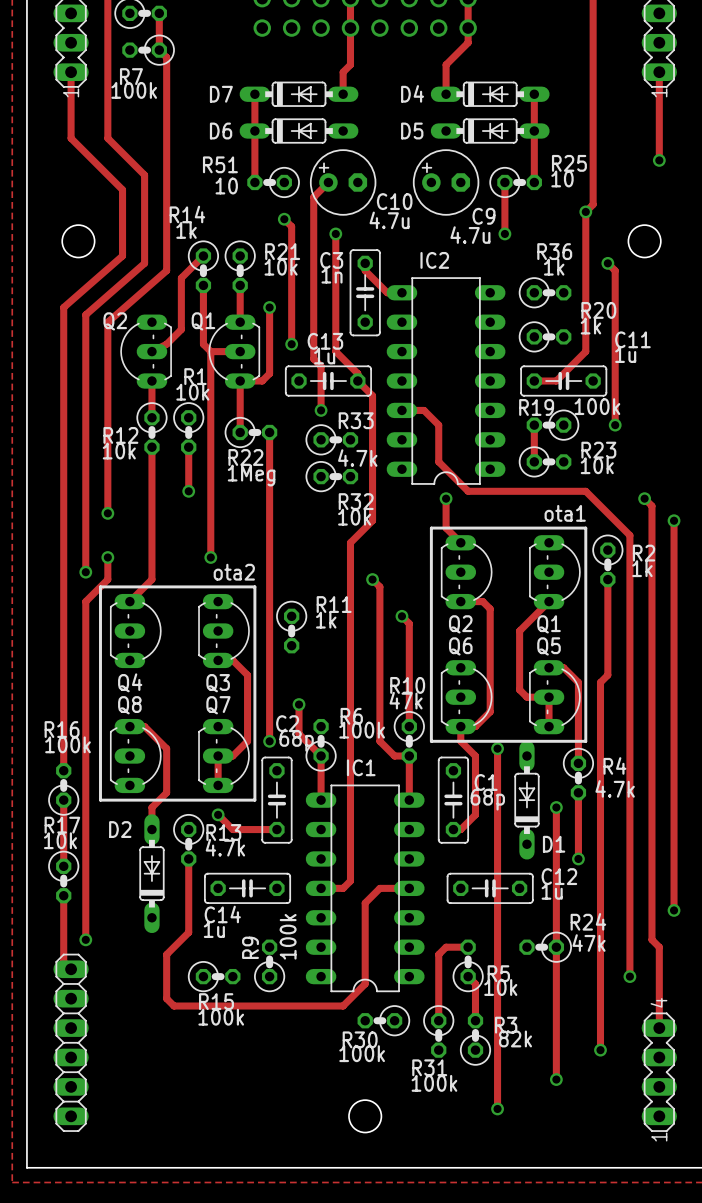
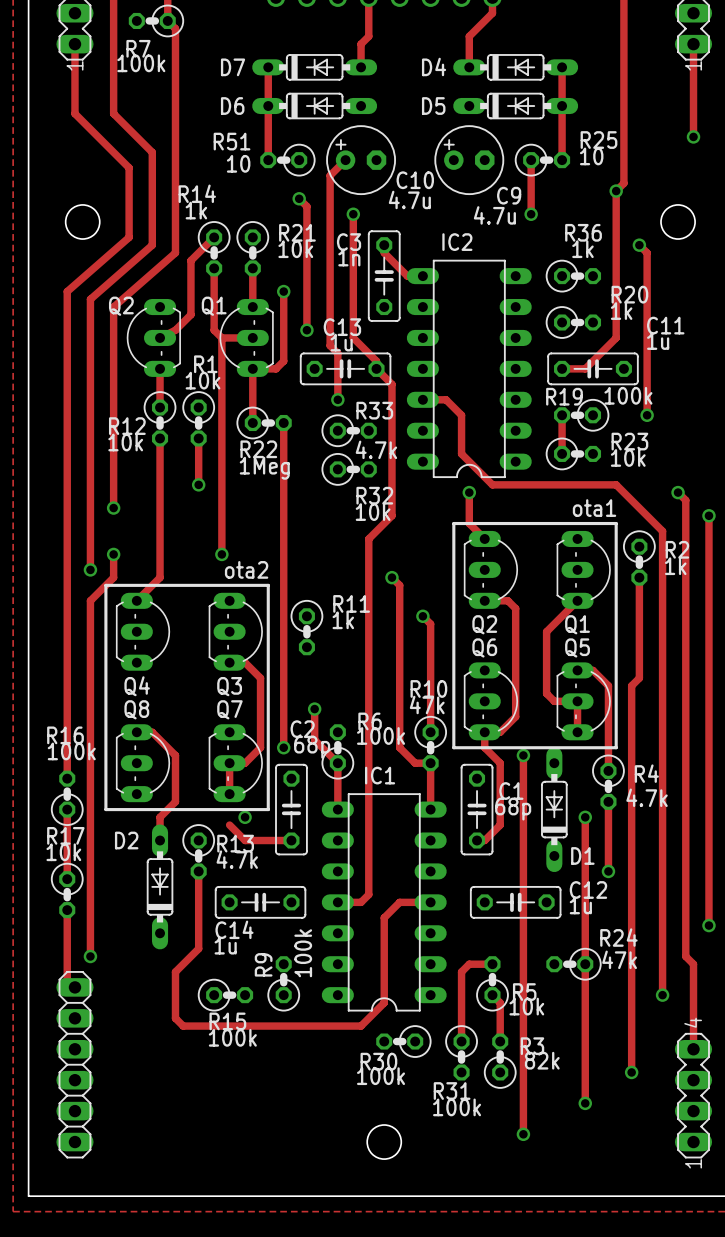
via position: (218, 814) -> (245, 817)

